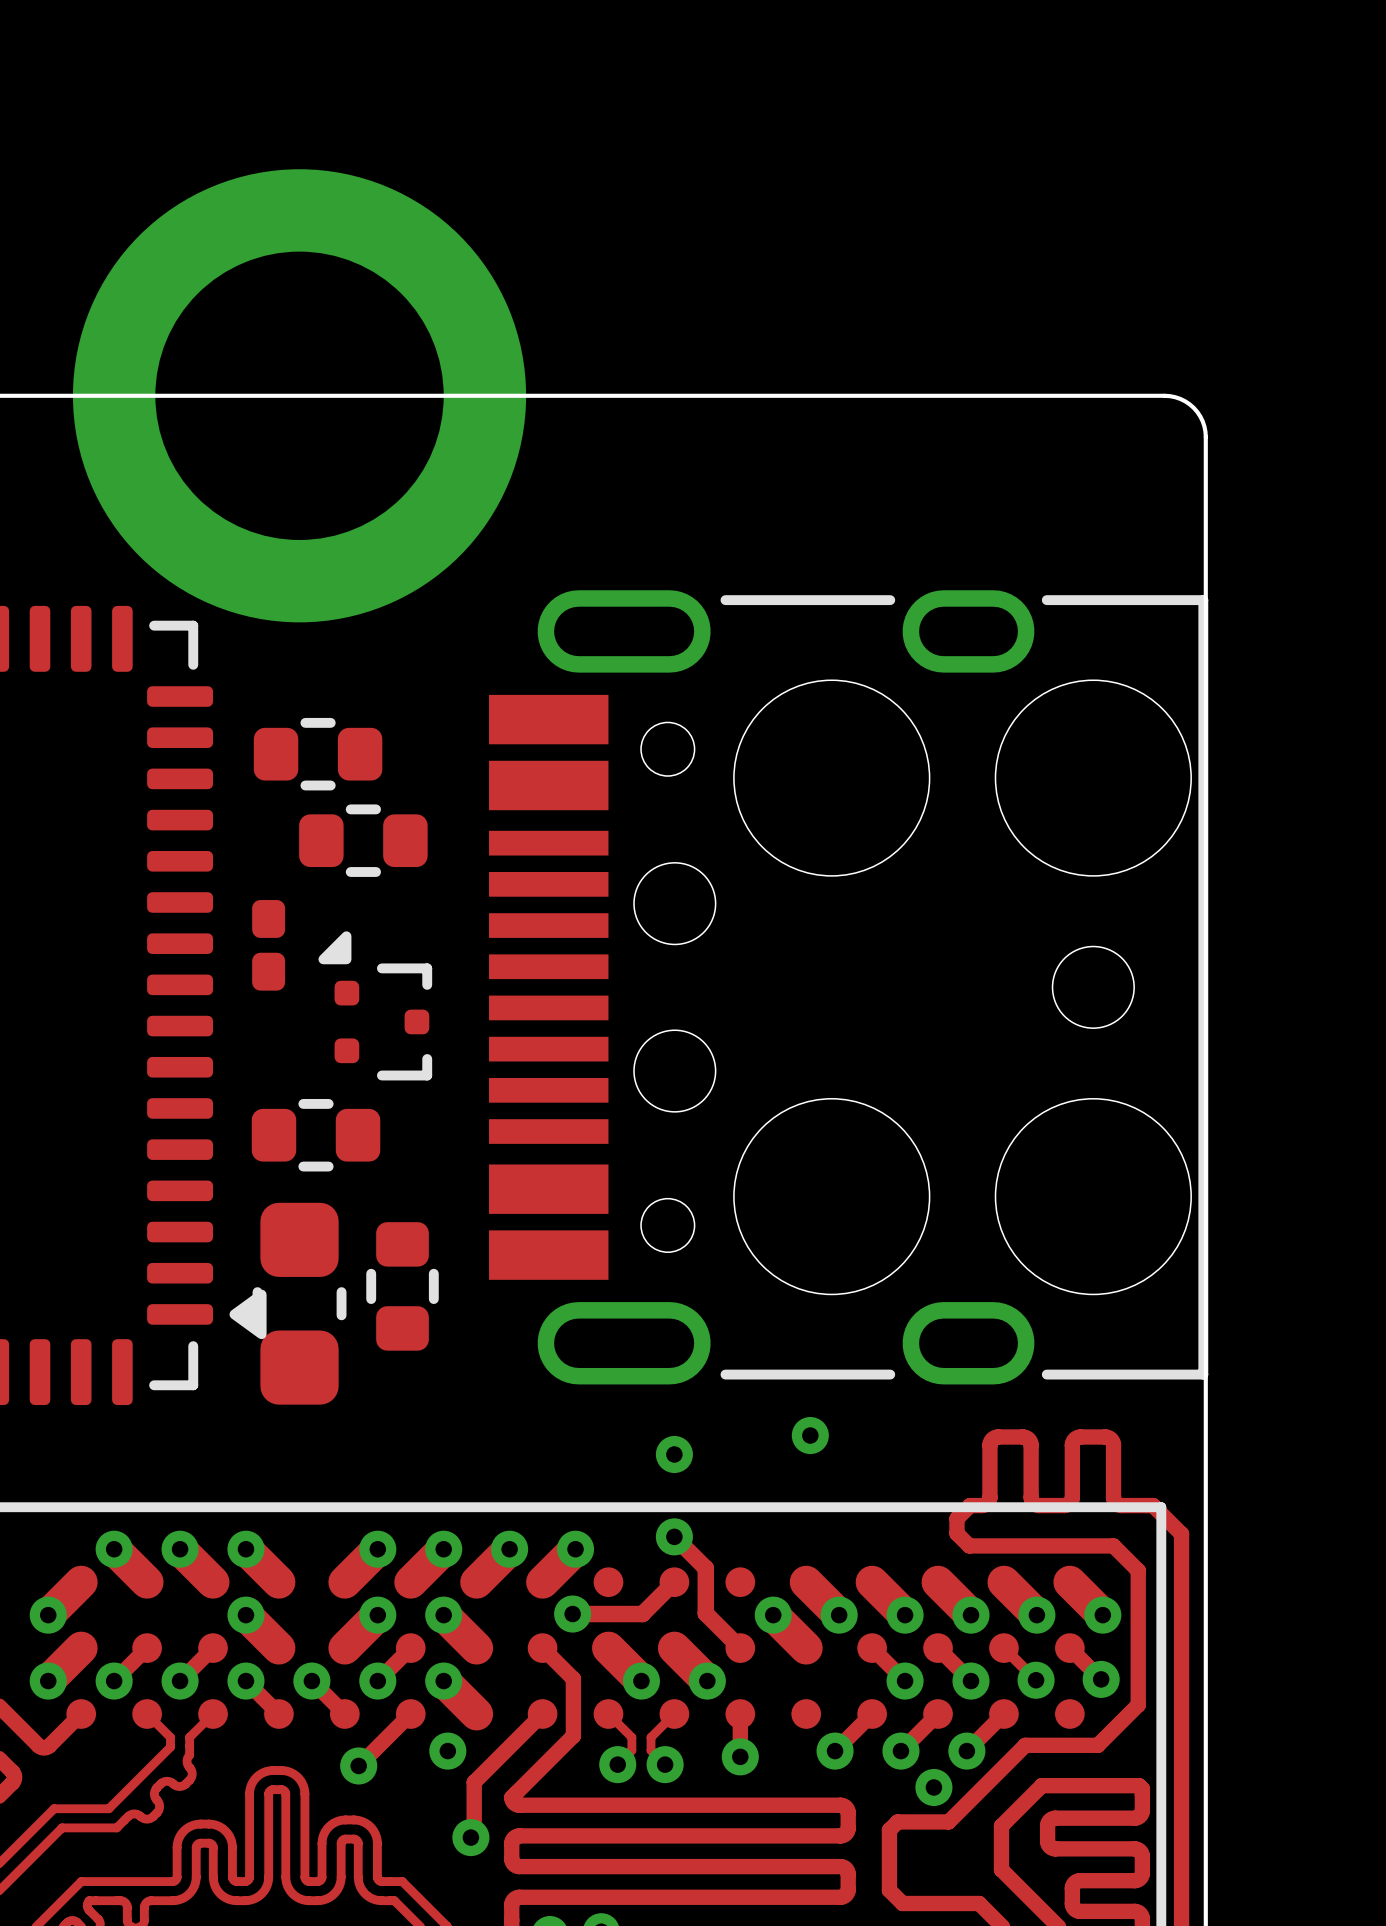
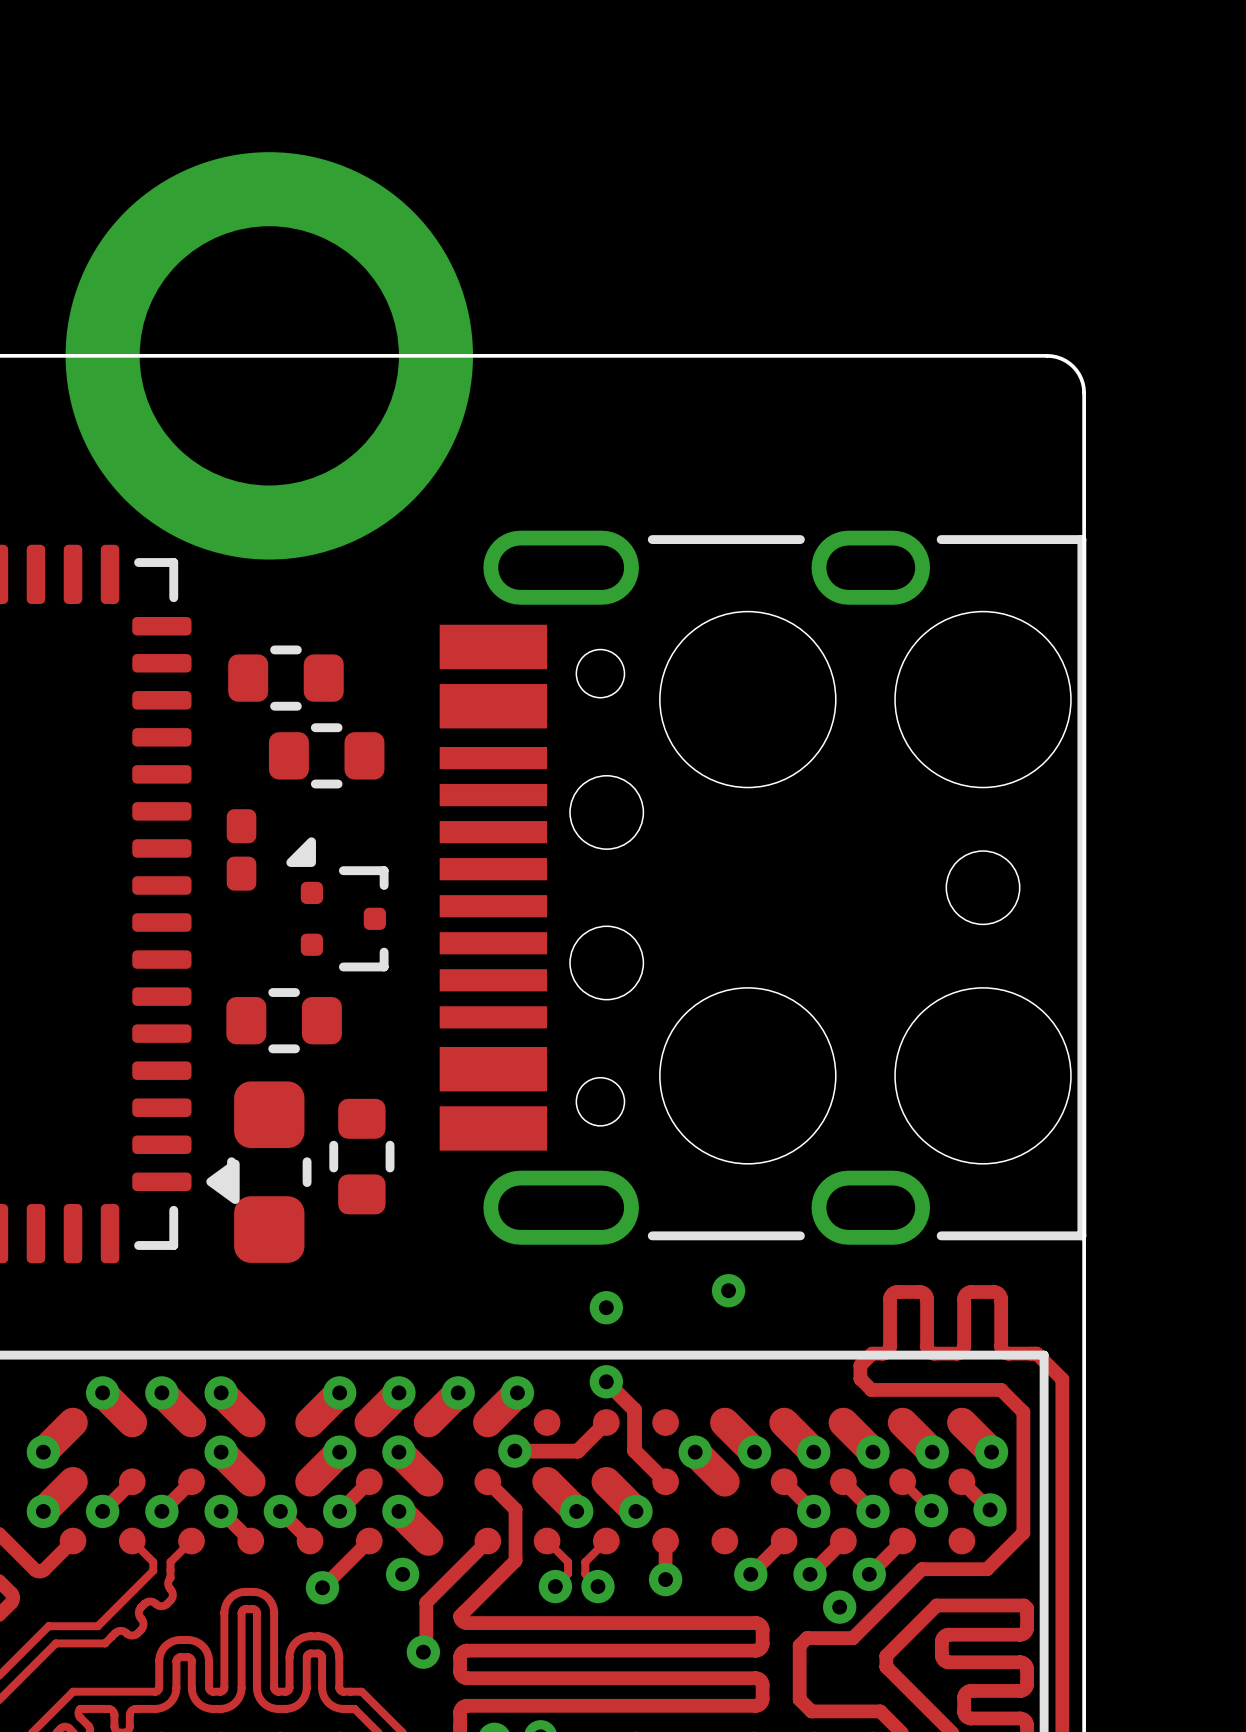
track: (1001, 1826) (1001, 1869) -> (900, 1641) (886, 1655) (886, 1666) (900, 1681)

